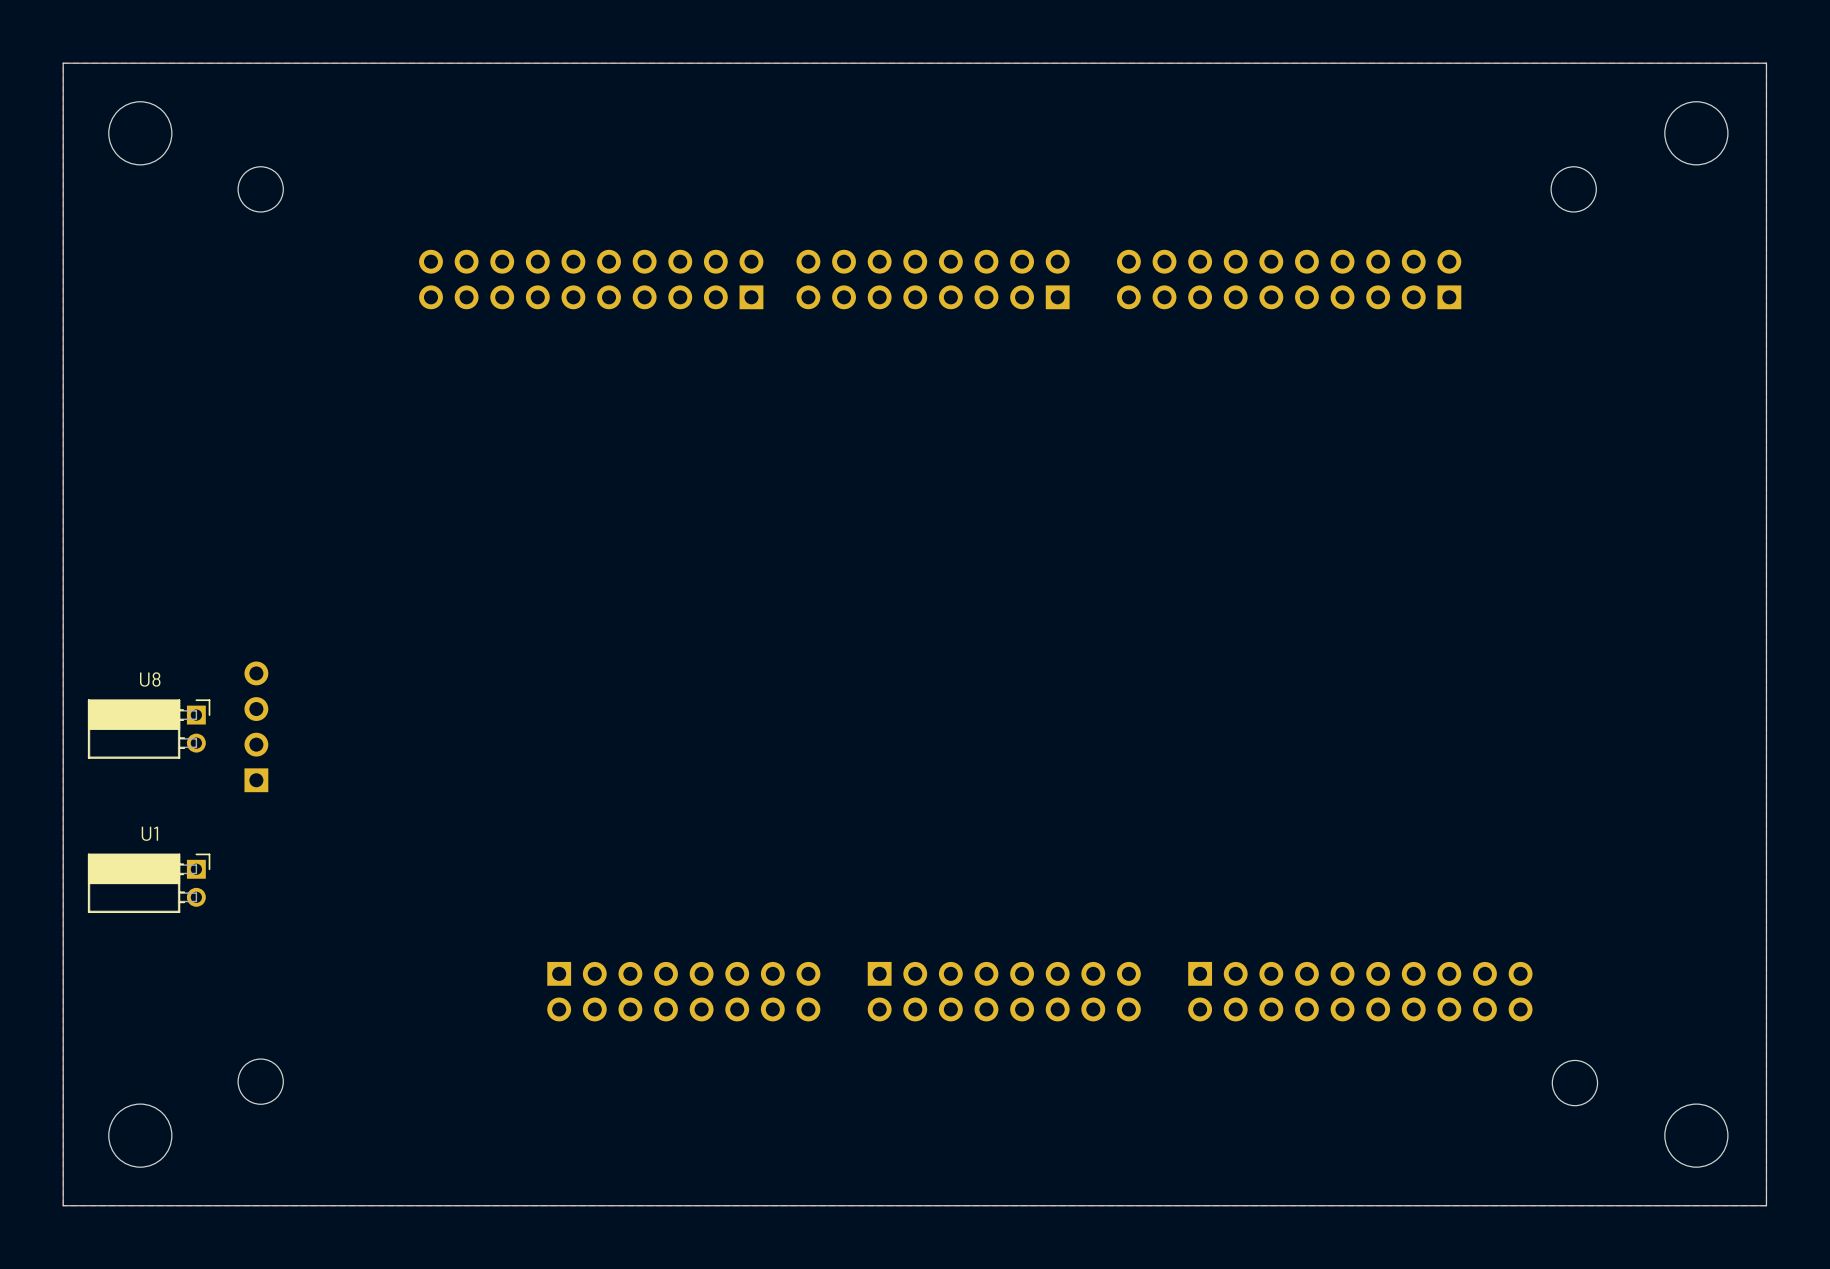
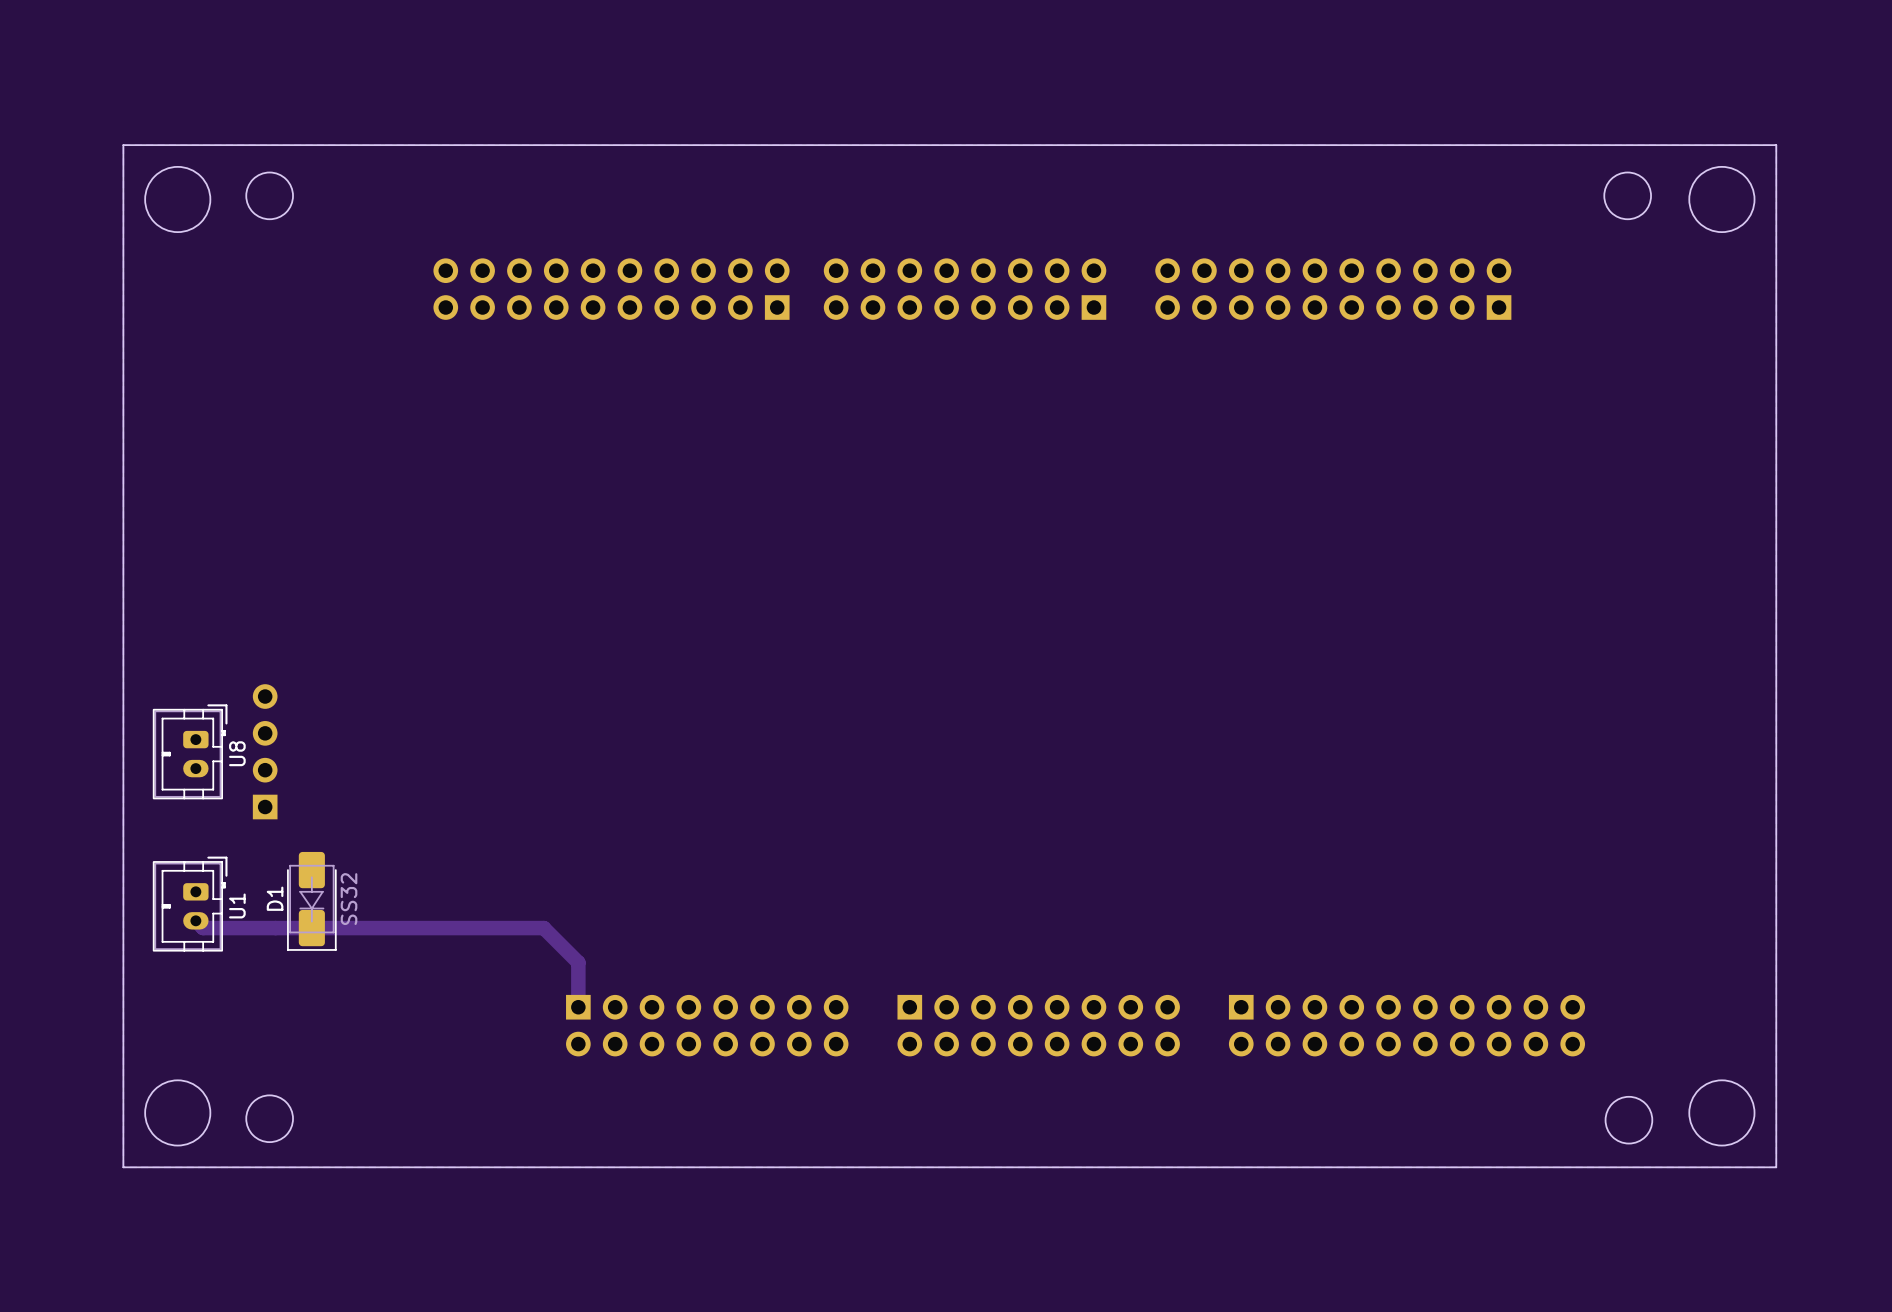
board edge: (63, 63) (1766, 63) (1766, 1205) (63, 1205) (63, 63) -> (123, 145) (123, 1167) (1776, 1167) (1776, 145) (123, 145)
round board edge position: (140, 133) -> (177, 199)
round board edge position: (1696, 133) -> (1721, 199)
U8 name position: U8 (150, 679) -> U8 (237, 753)
U8 footprint: [87, 699, 211, 759] -> [152, 704, 228, 800]
U1 name position: U1 (149, 833) -> U1 (237, 905)
U1 footprint: [87, 853, 211, 914] -> [152, 856, 228, 952]
D1: none -> SS32 (311, 901)
track: none -> (195, 920) (203, 928) (543, 928) (578, 962) (578, 1007)
round board edge position: (140, 1135) -> (177, 1112)
round board edge position: (1696, 1135) -> (1721, 1112)

